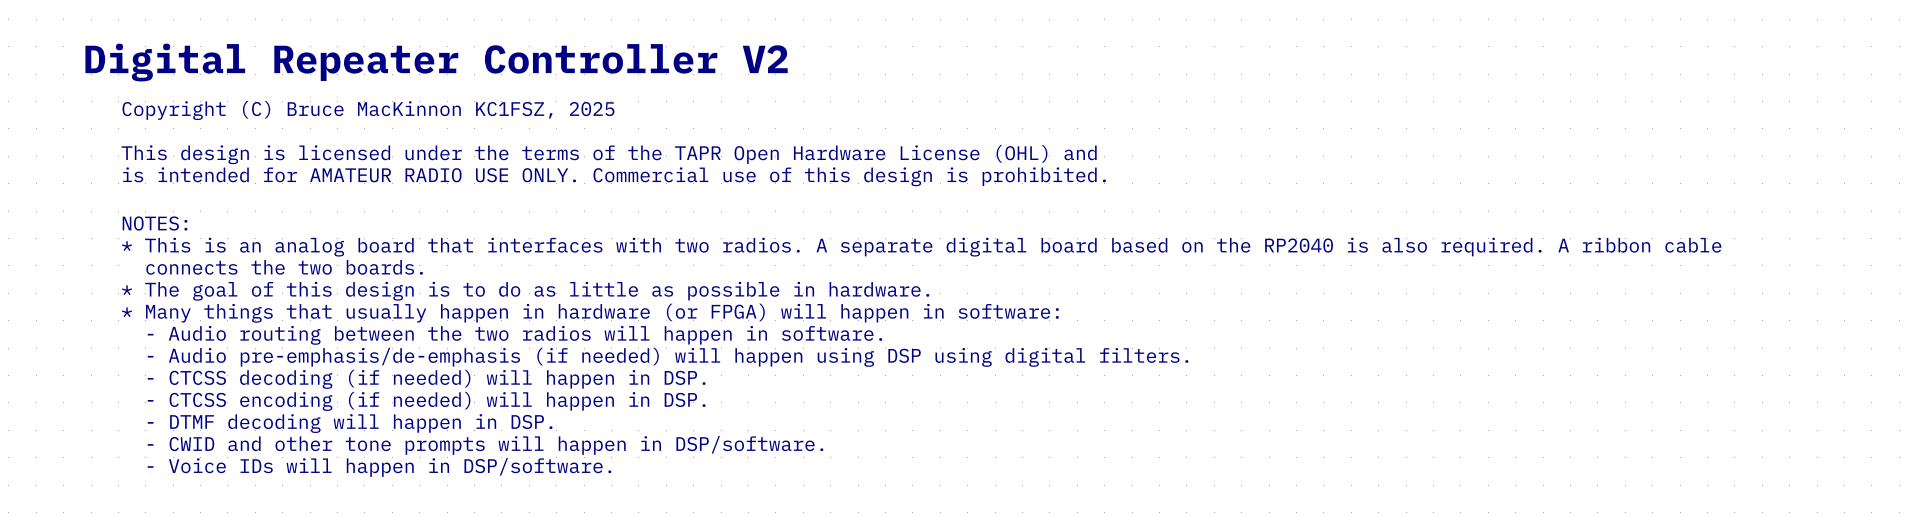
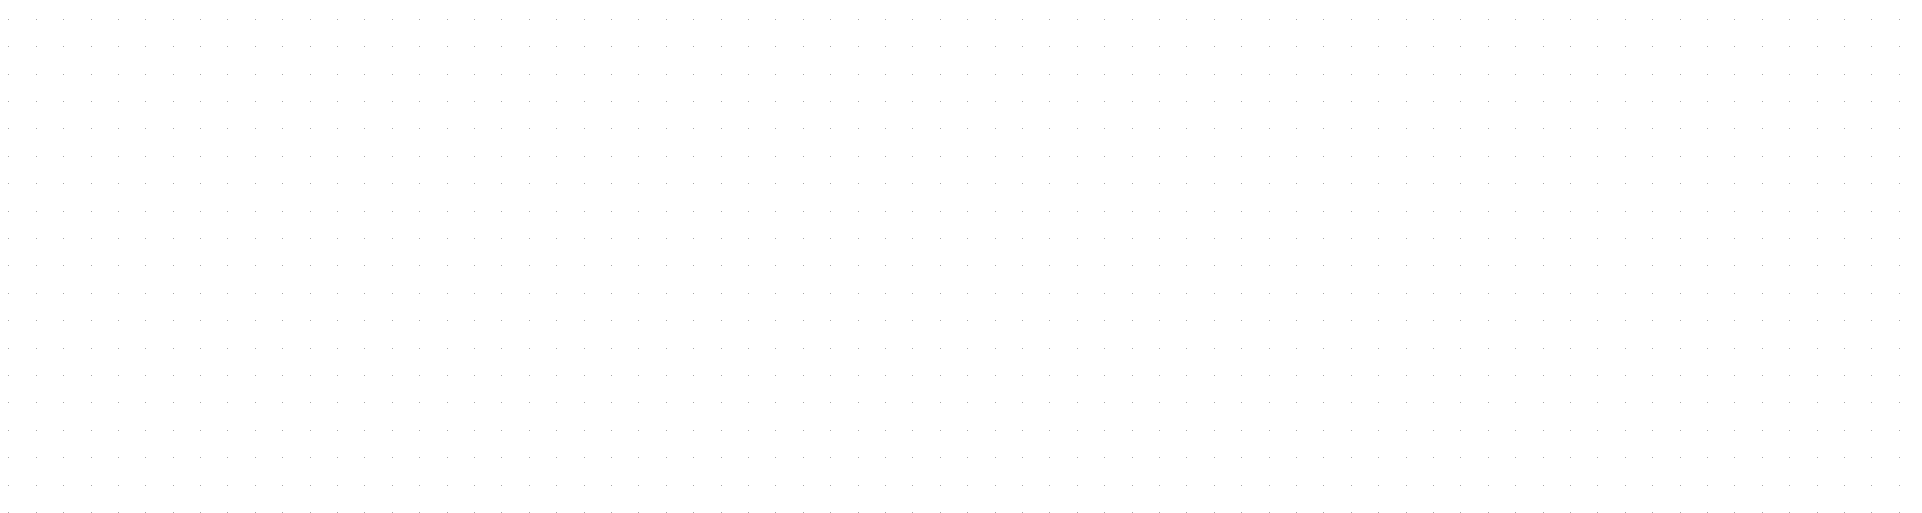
text: Digital Repeater Controller V2 (436, 62) -> none
text: Copyright (C) Bruce MacKinnon KC1FSZ, 2025 (368, 110) -> none
text: This design is licensed under the terms of the TAPR Open Hardware License (OHL) and (609, 154) -> none
text: is intended for AMATEUR RADIO USE ONLY. Commercial use of this design is prohibited. (614, 176) -> none
text: NOTES: (155, 223) -> none
text: * This is an analog board that interfaces with two radios. A separate digital board based on the RP2040 is also required. A ribbon cable (921, 247) -> none
text: connects the two boards. (284, 267) -> none
text: * The goal of this design is to do as little as possible in hardware. (525, 291) -> none
text: * Many things that usually happen in hardware (or FPGA) will happen in software: (590, 313) -> none
text: - Audio routing between the two radios will happen in software. (514, 335) -> none
text: - Audio pre-emphasis/de-emphasis (if needed) will happen using DSP using digital filters. (668, 357) -> none
text: - CTCSS decoding (if needed) will happen in DSP. (426, 379) -> none
text: - CTCSS encoding (if needed) will happen in DSP. (426, 401) -> none
text: - DTMF decoding will happen in DSP. (350, 423) -> none
text: - CWID and other tone prompts will happen in DSP/software. (485, 445) -> none
text: - Voice IDs will happen in DSP/software. (379, 467) -> none

